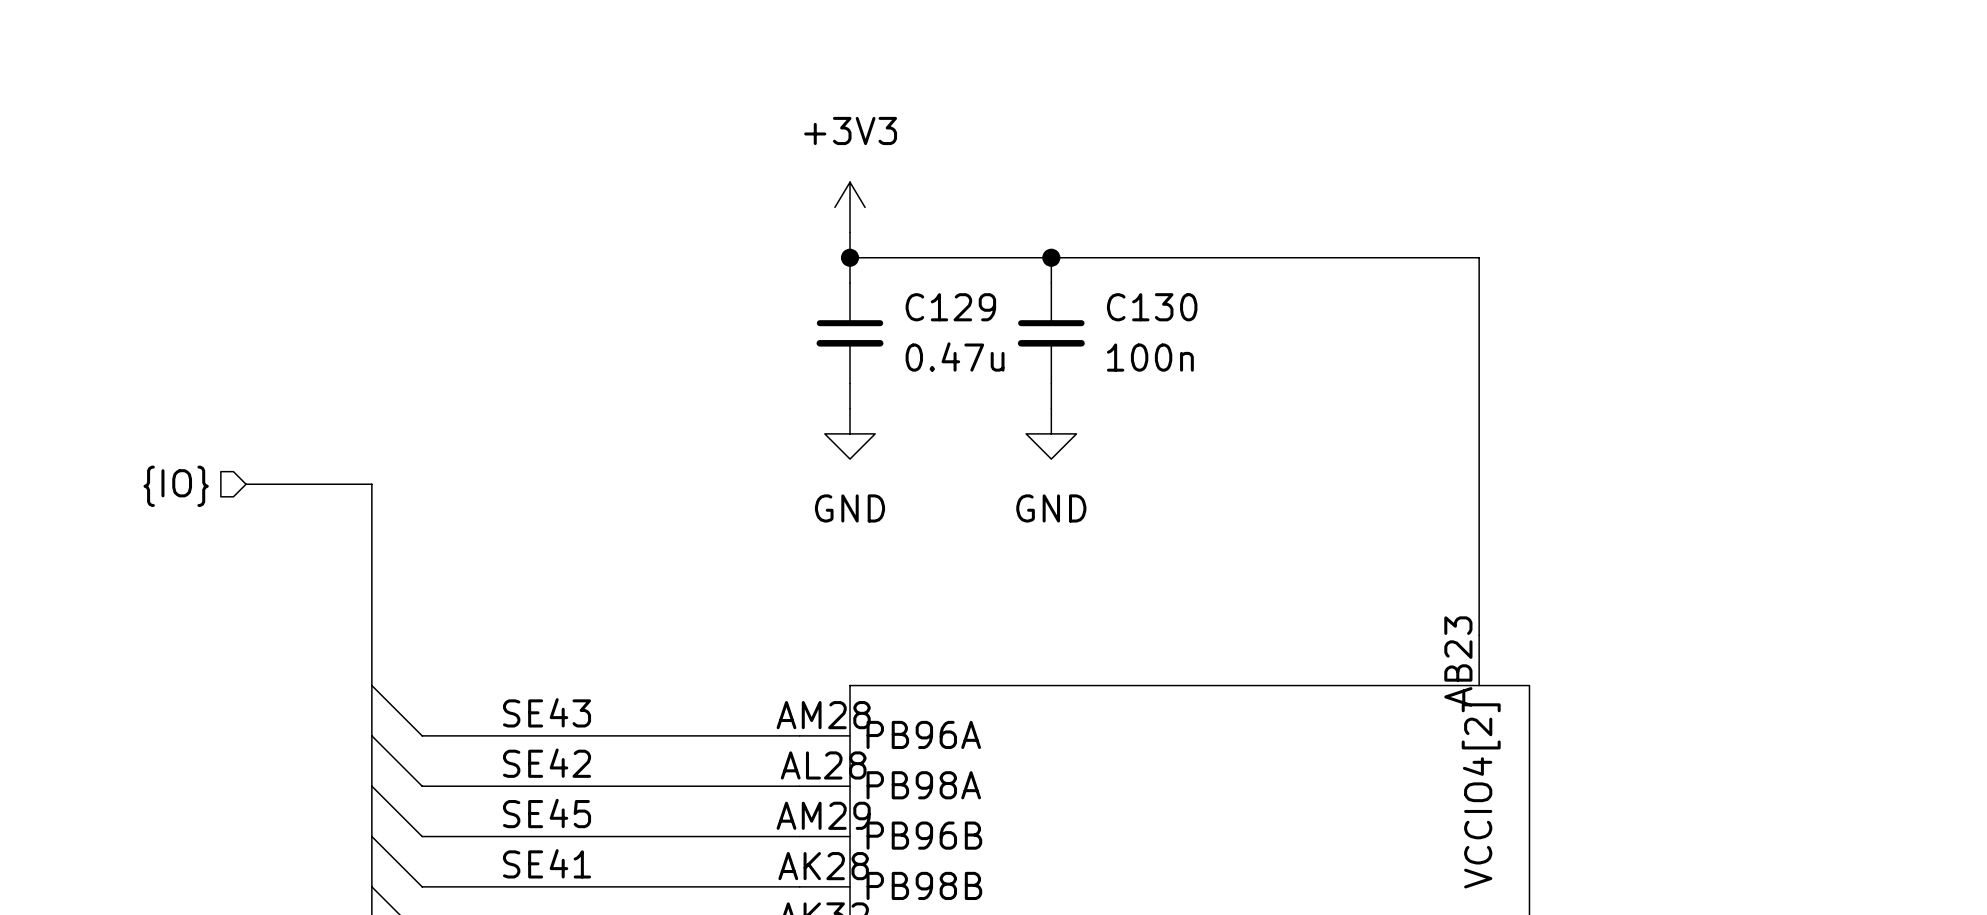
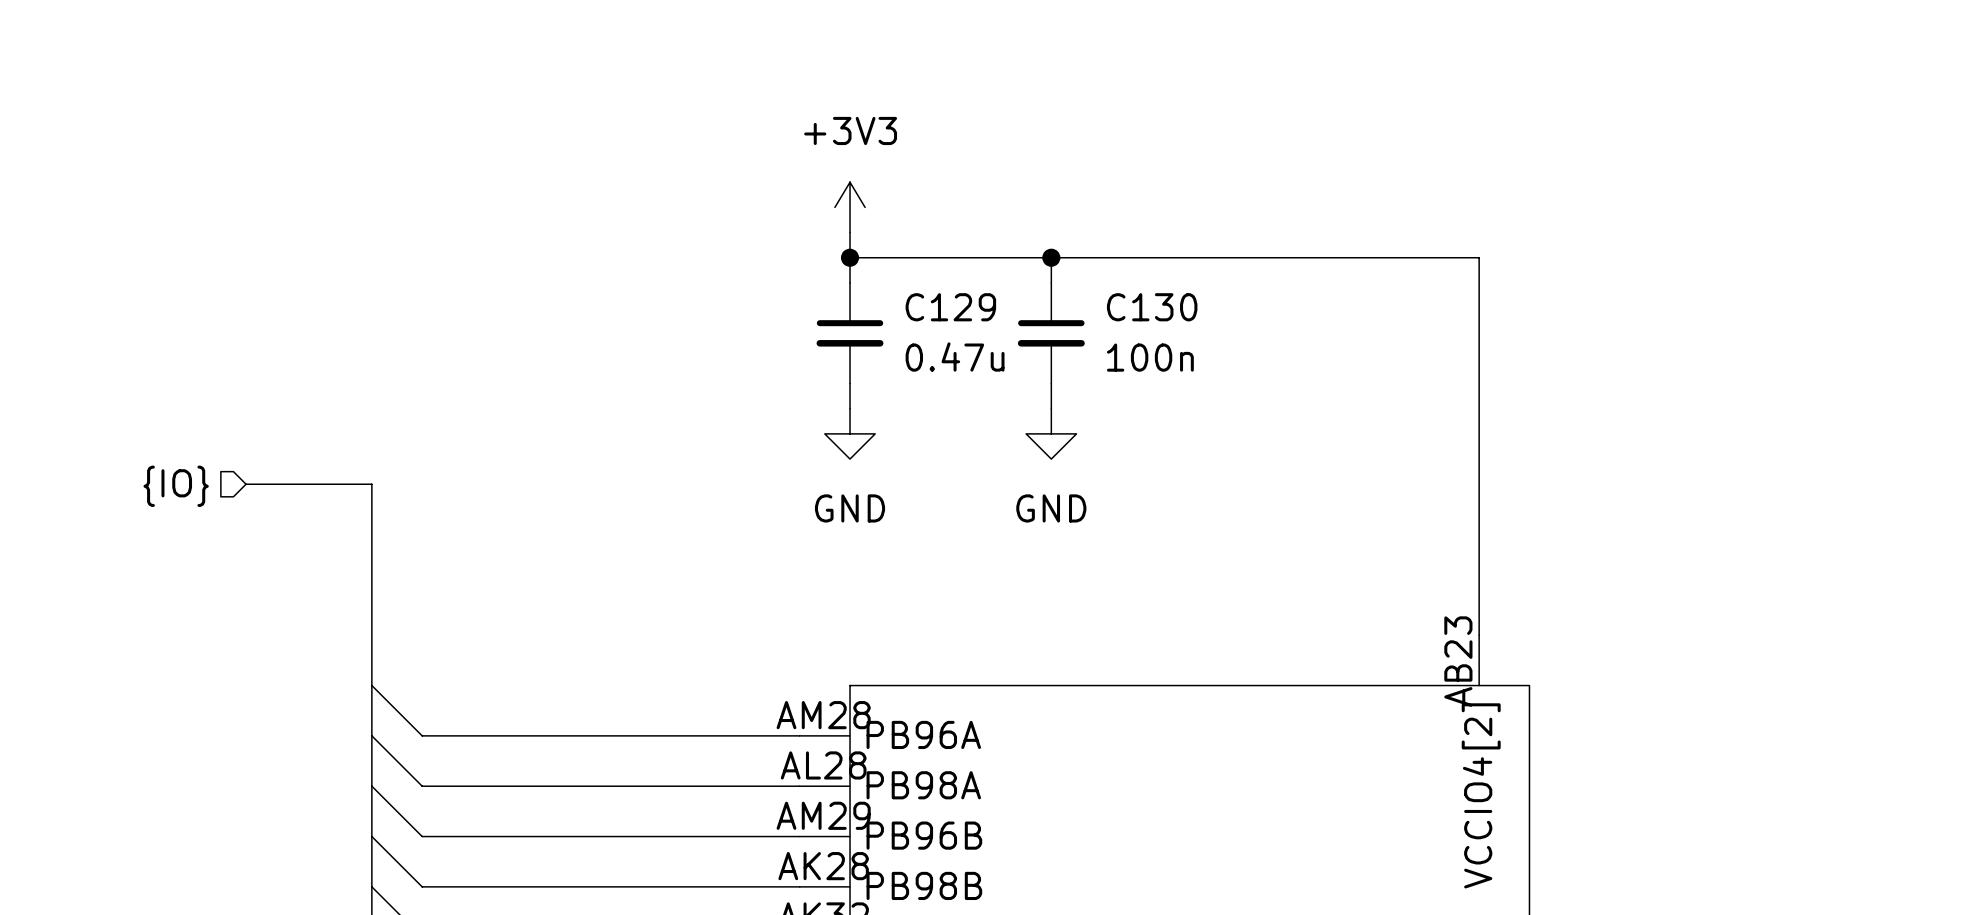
label: SE43 (547, 712) -> none
label: SE42 (547, 763) -> none
label: SE45 (547, 813) -> none
label: SE41 (547, 863) -> none

